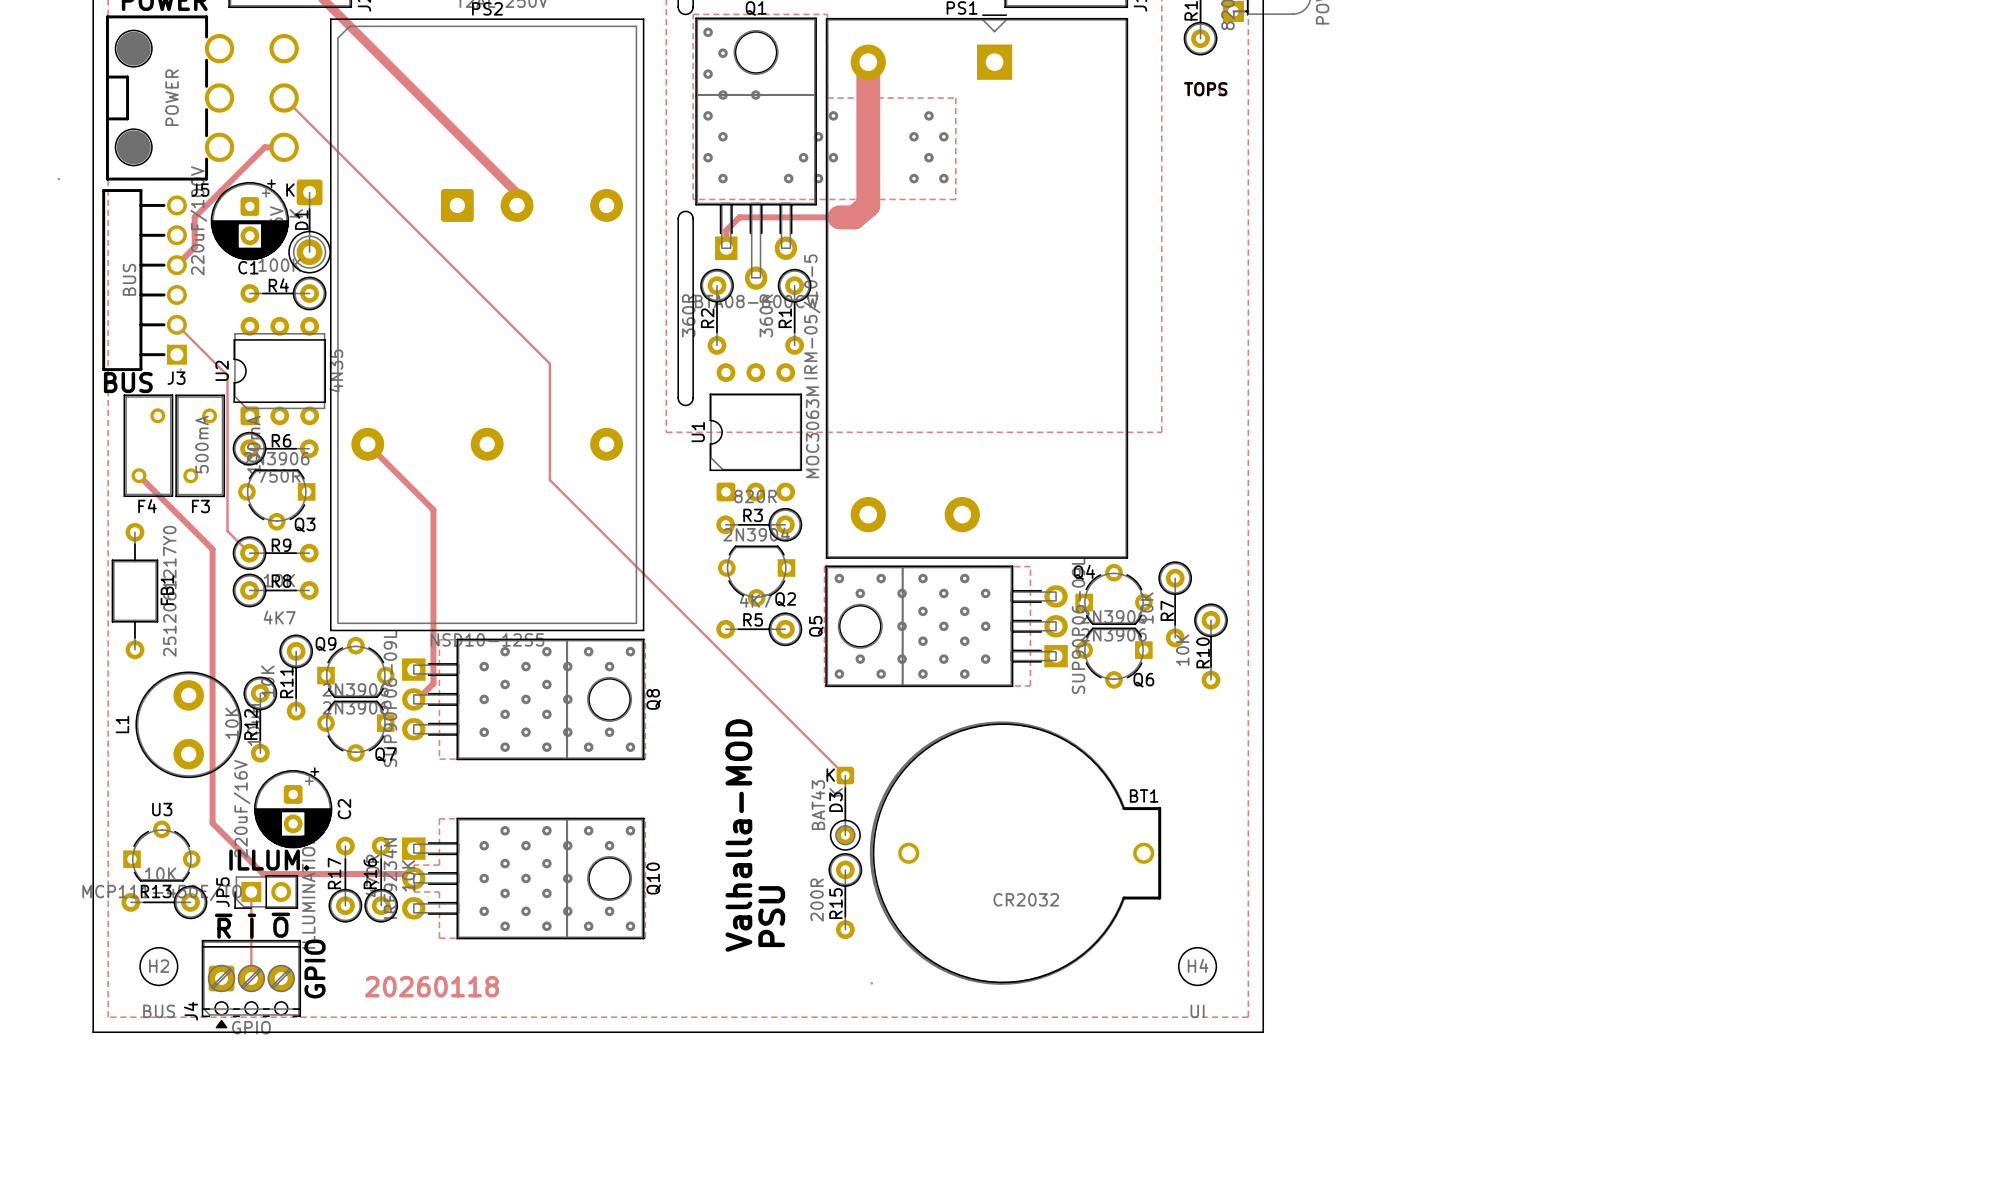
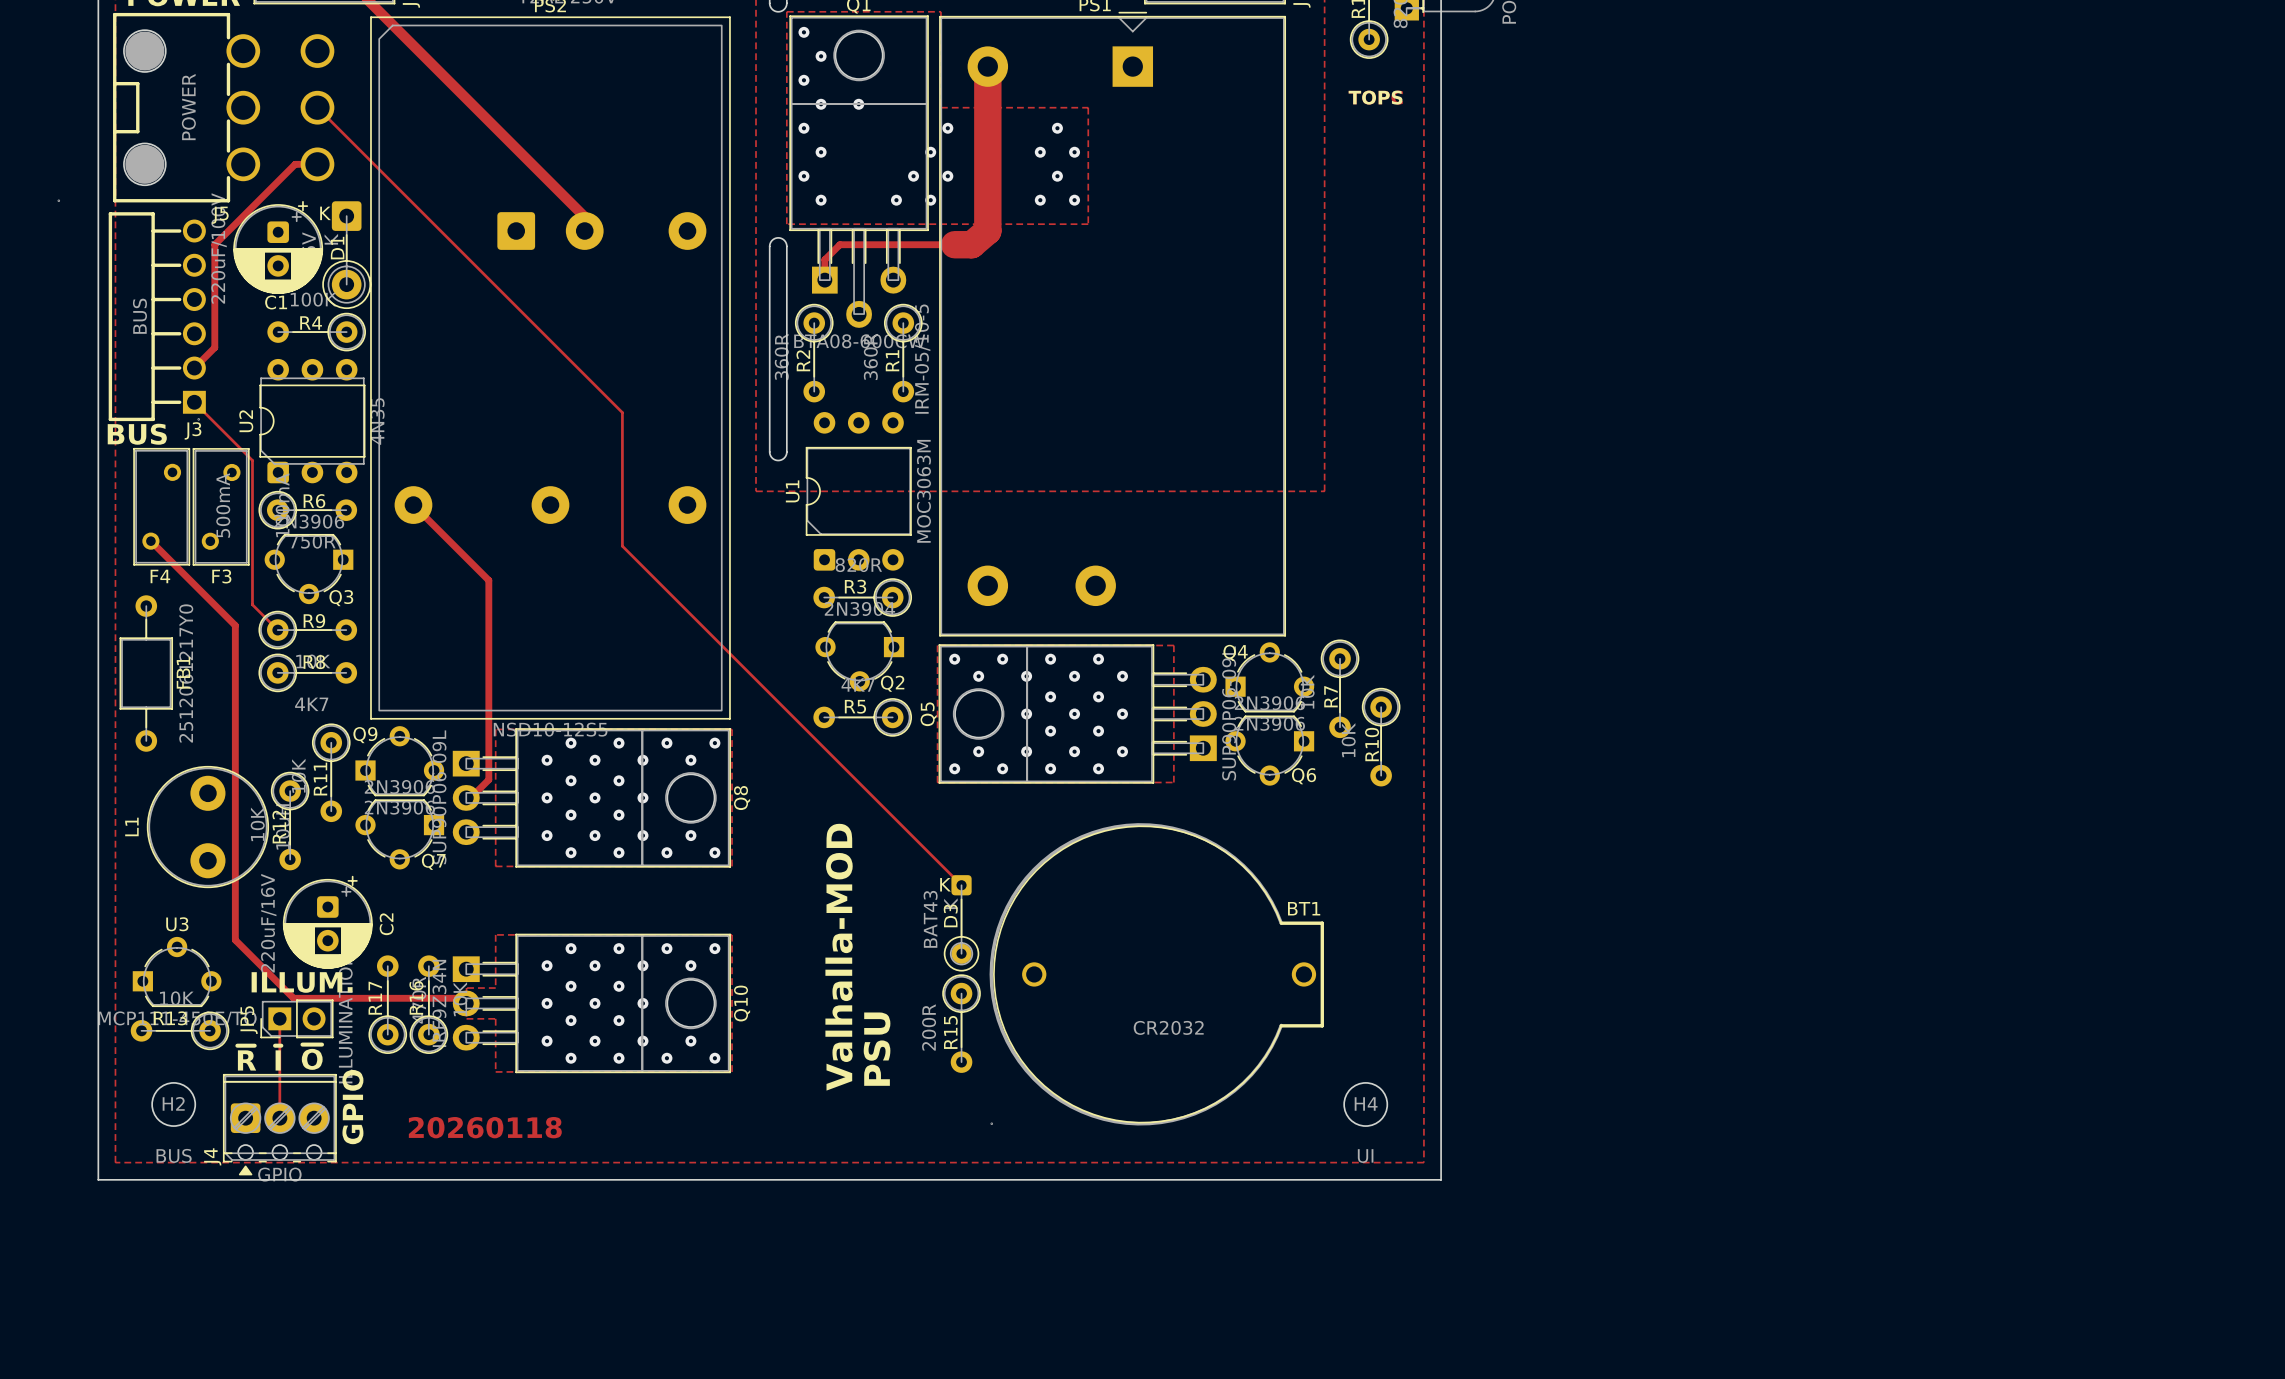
track: (194, 247) (176, 265) -> (214, 279) (214, 347) (194, 368)
track: (176, 324) (227, 375) (227, 405) -> (194, 402) (252, 460)

